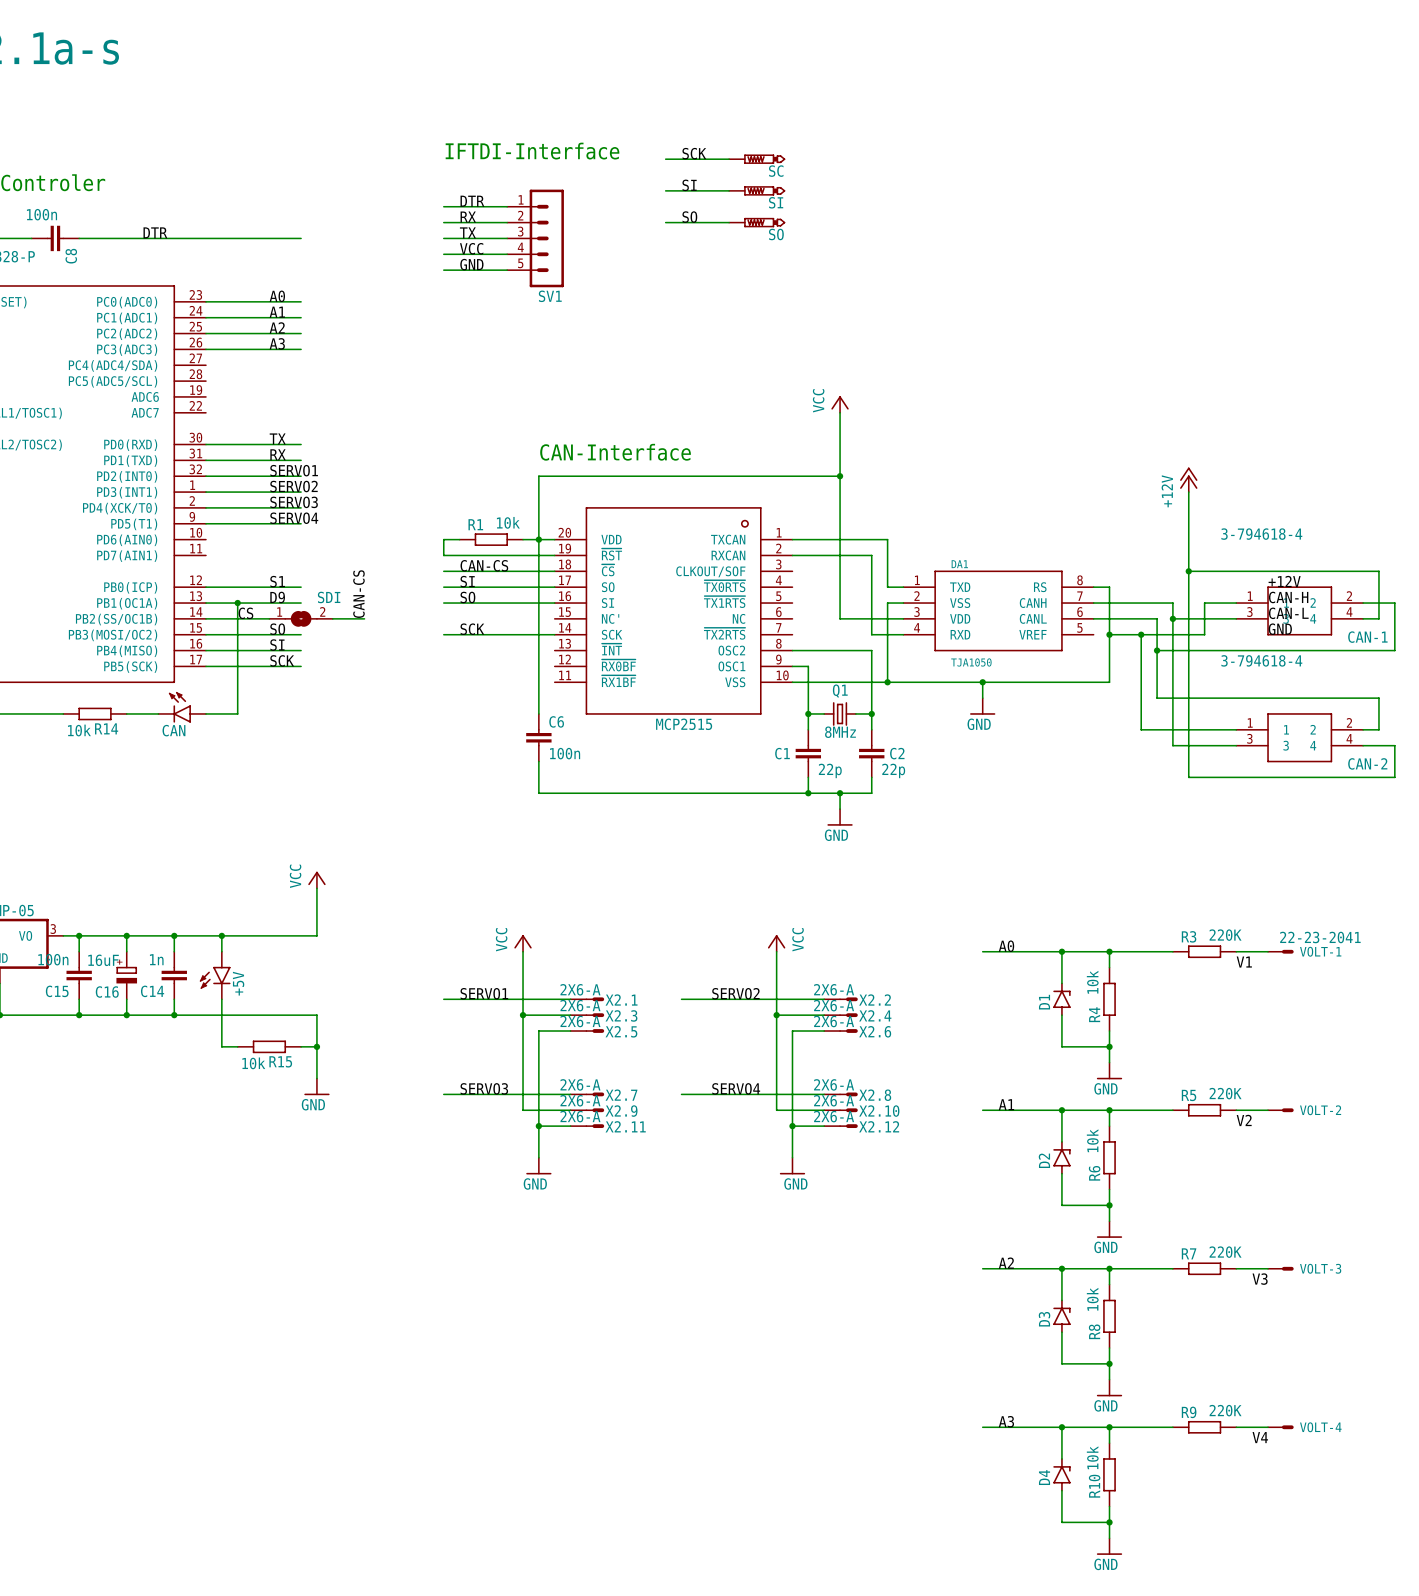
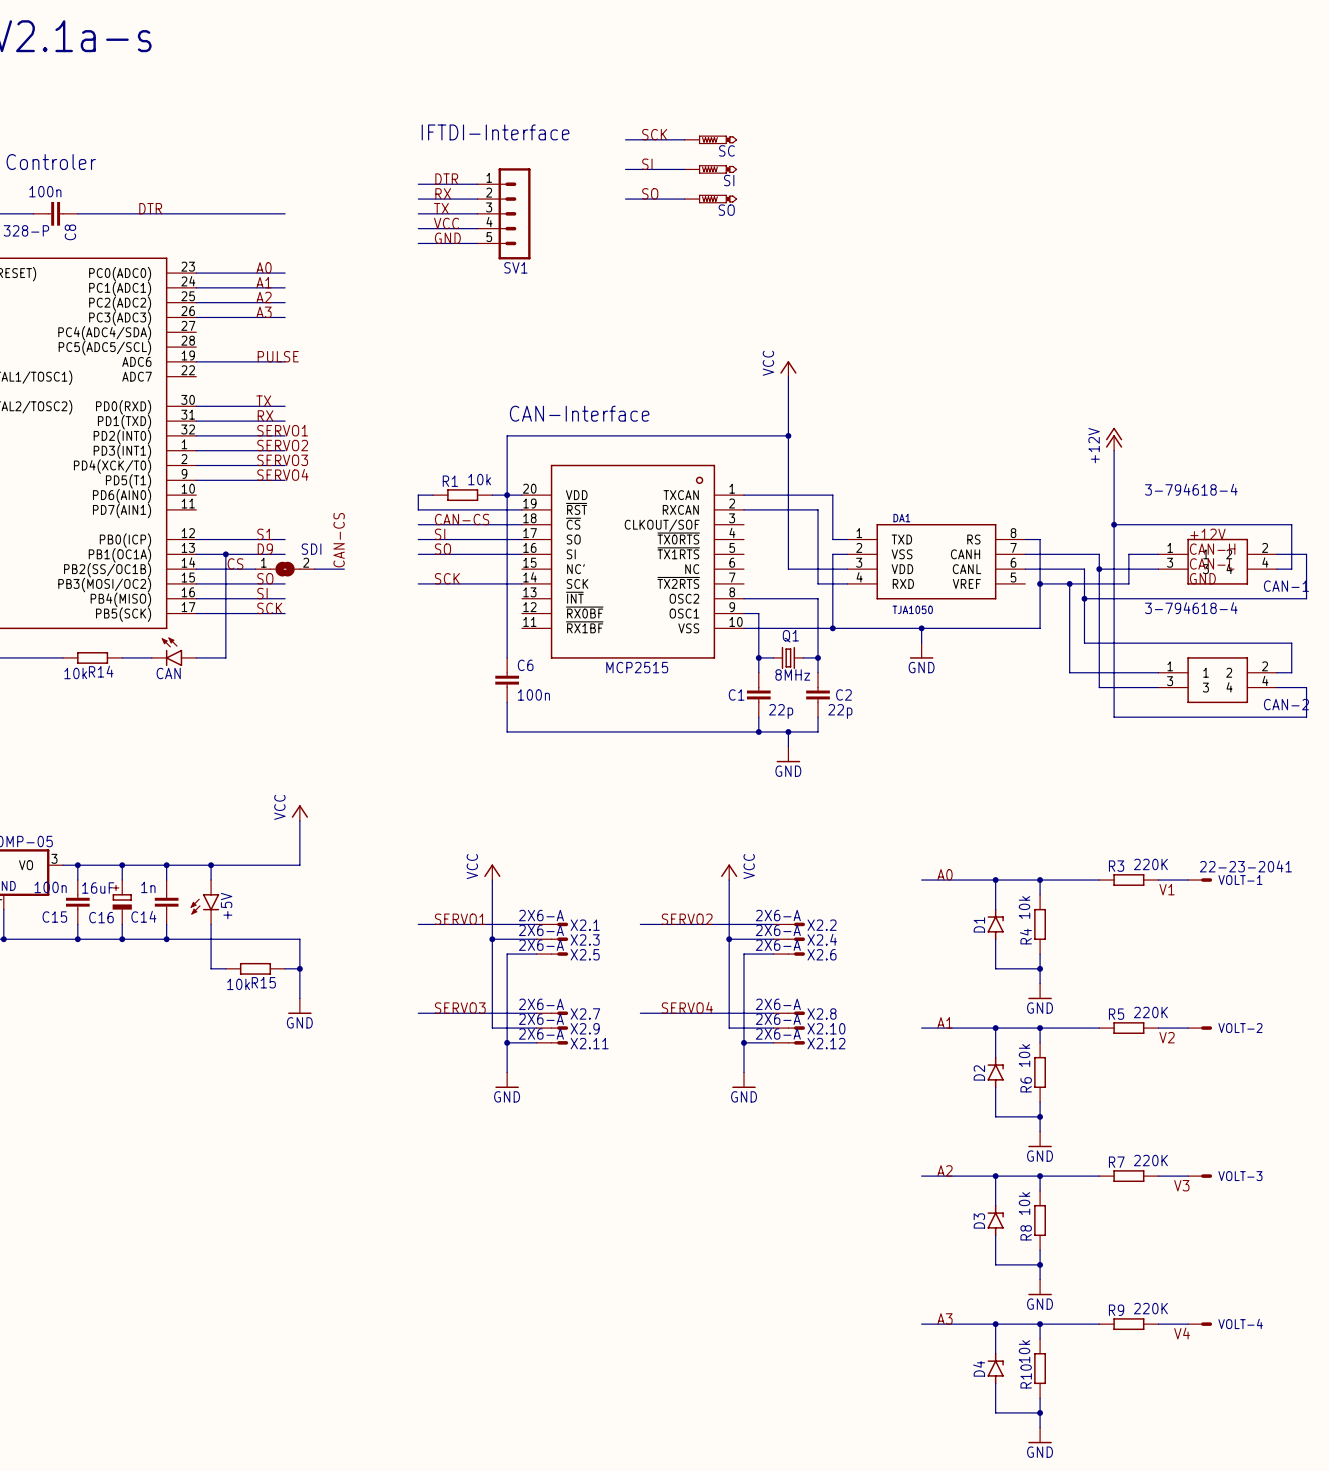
label: none -> PULSE (278, 356)
wire: none -> (196, 361) (285, 361)

